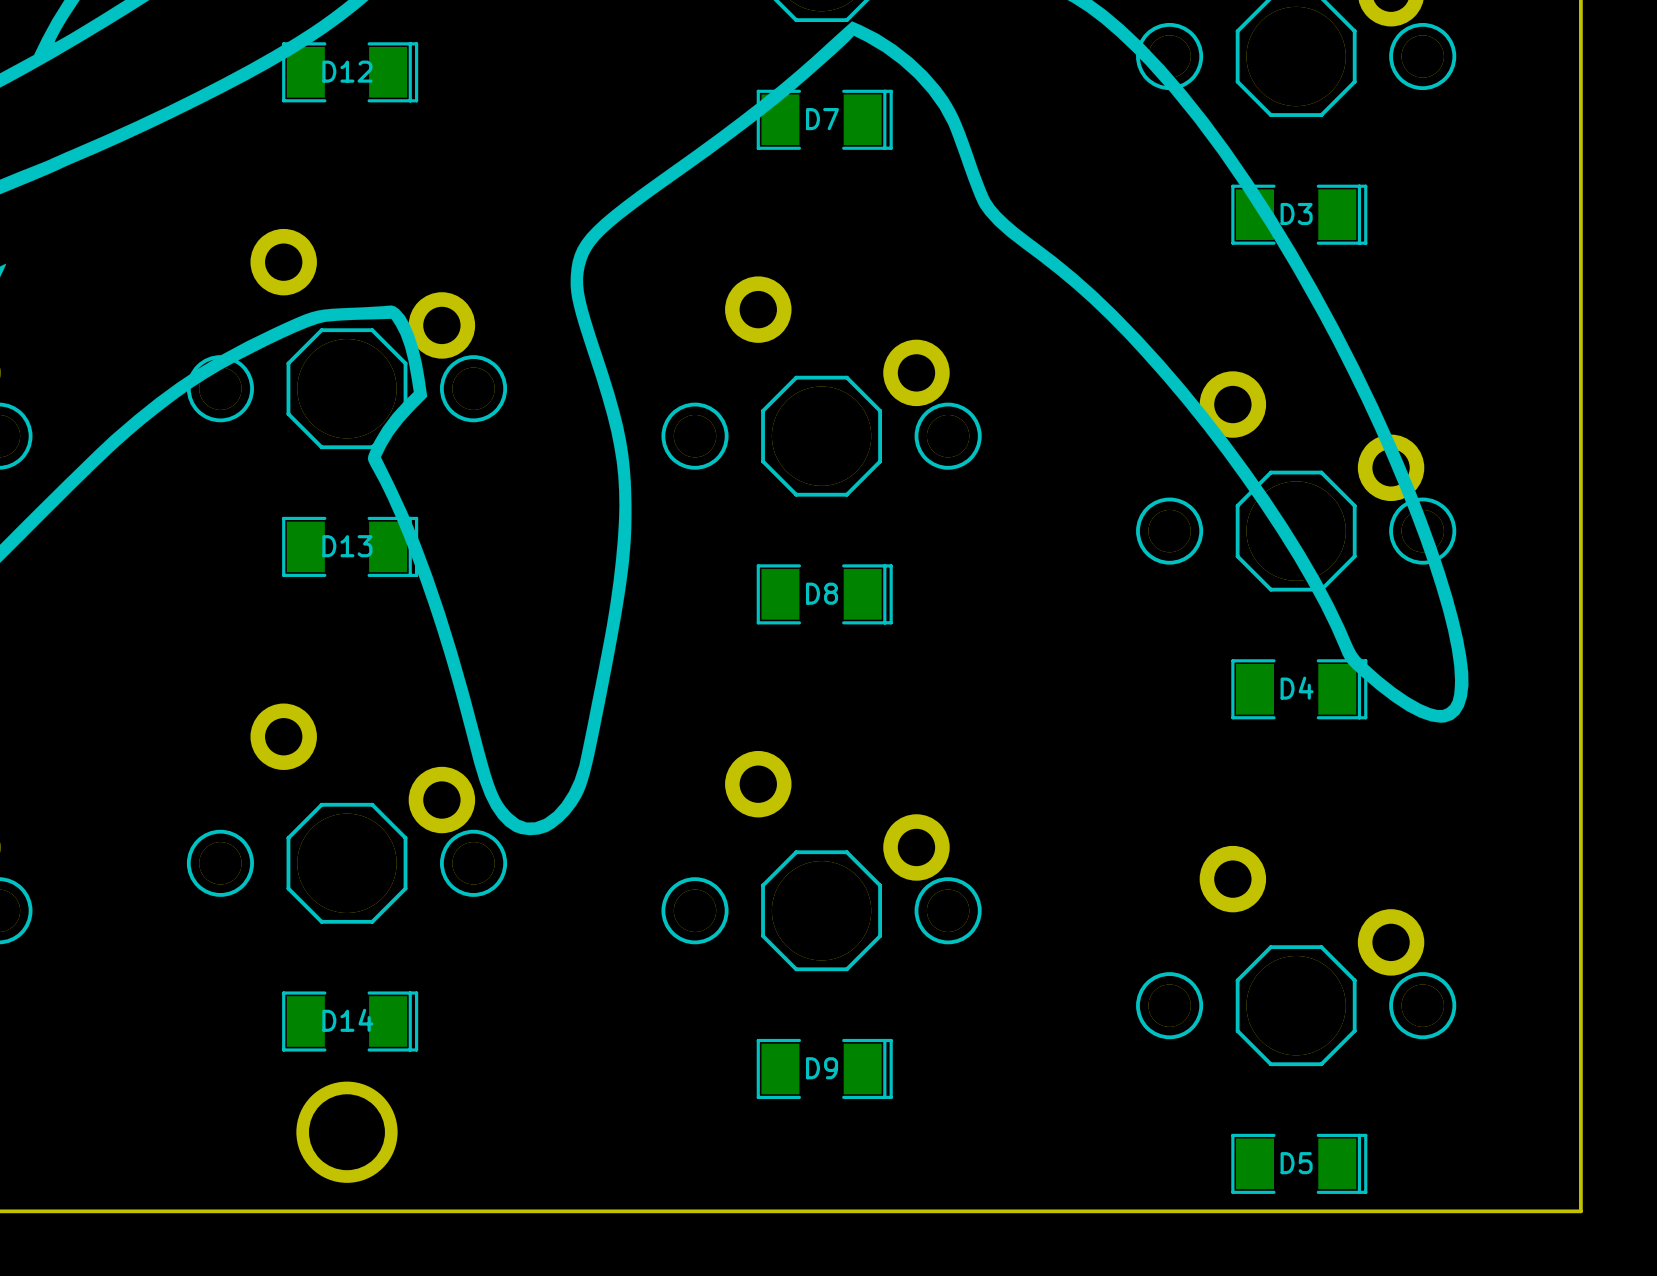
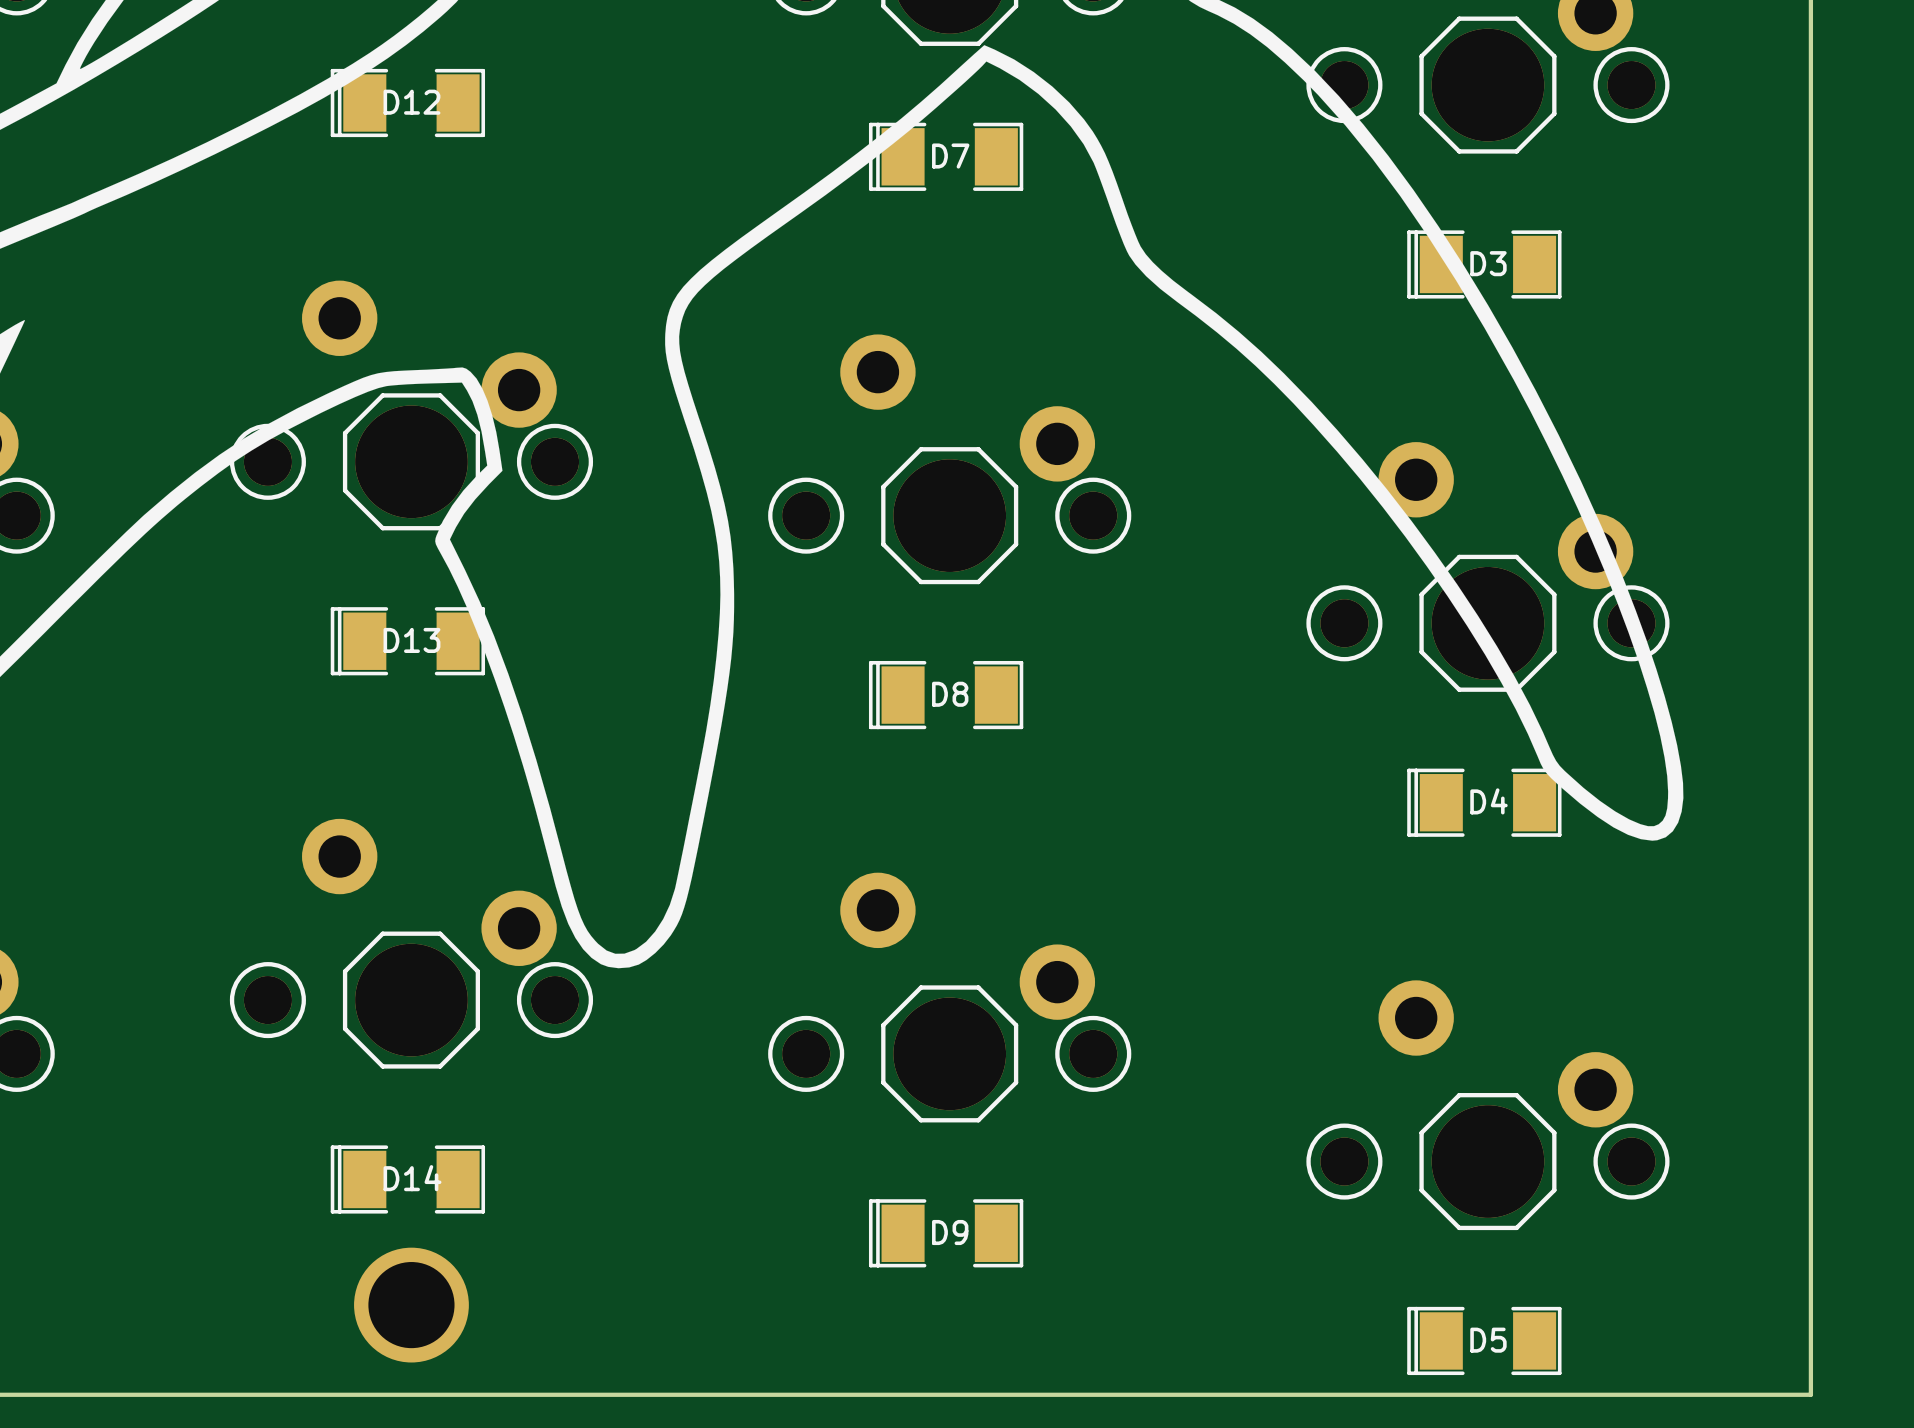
D12 rotation: 0° (350, 72) -> 180° (407, 103)
D7 rotation: 0° (824, 119) -> 180° (946, 156)
D3 rotation: 0° (1299, 214) -> 180° (1484, 264)
D13 rotation: 0° (350, 546) -> 180° (407, 641)
D8 rotation: 0° (824, 594) -> 180° (946, 695)
D4 rotation: 0° (1299, 689) -> 180° (1484, 802)
D14 rotation: 0° (350, 1021) -> 180° (407, 1179)
D9 rotation: 0° (824, 1068) -> 180° (946, 1233)
D5 rotation: 0° (1299, 1163) -> 180° (1484, 1340)

